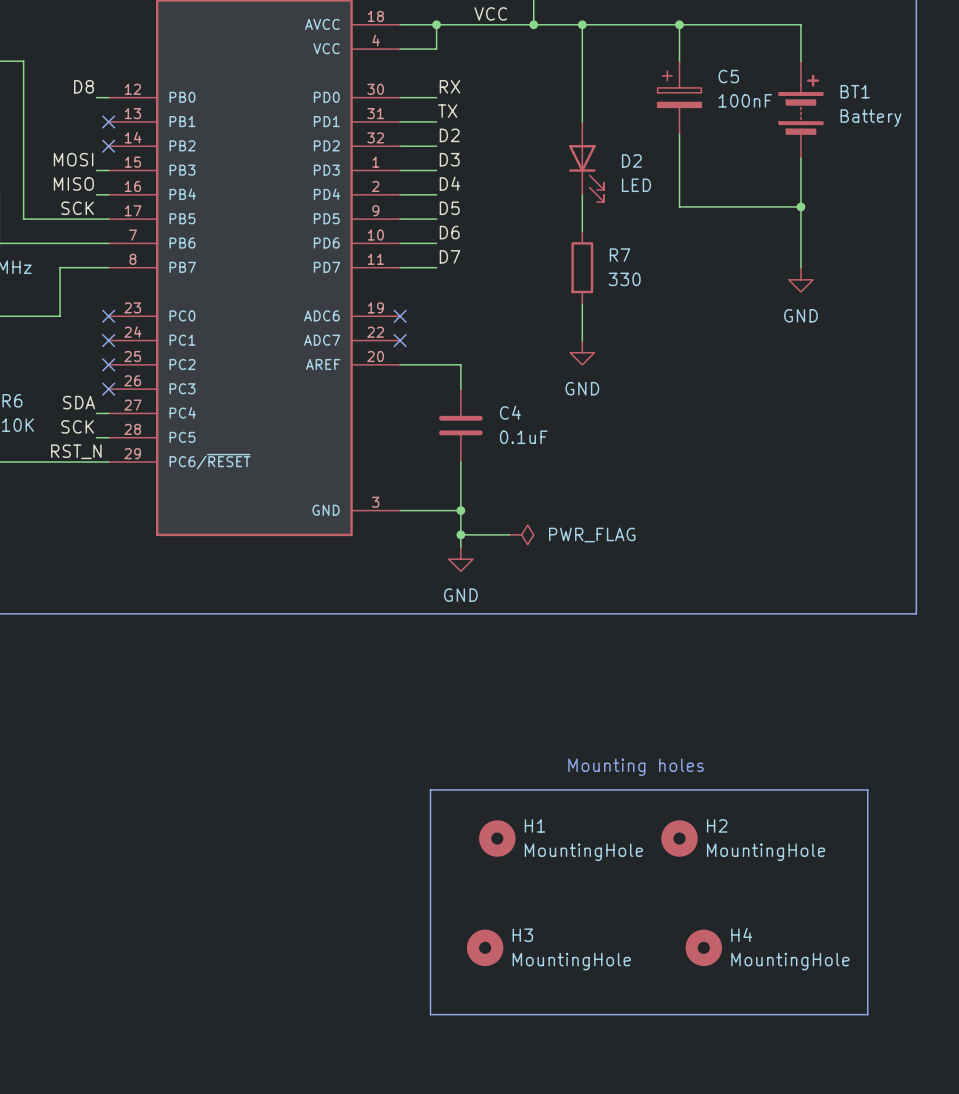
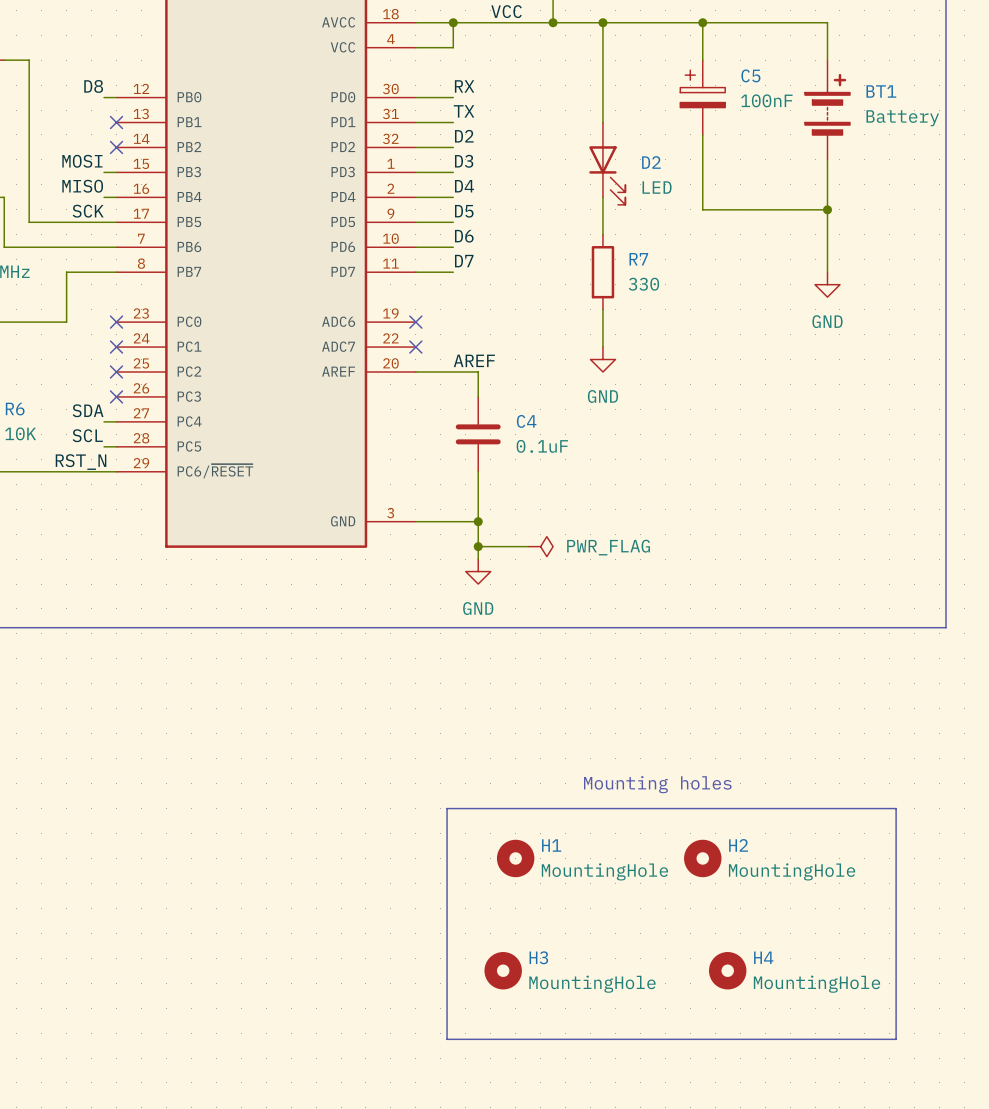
label: none -> AREF (474, 360)
label: SCK (77, 426) -> SCL (87, 435)

